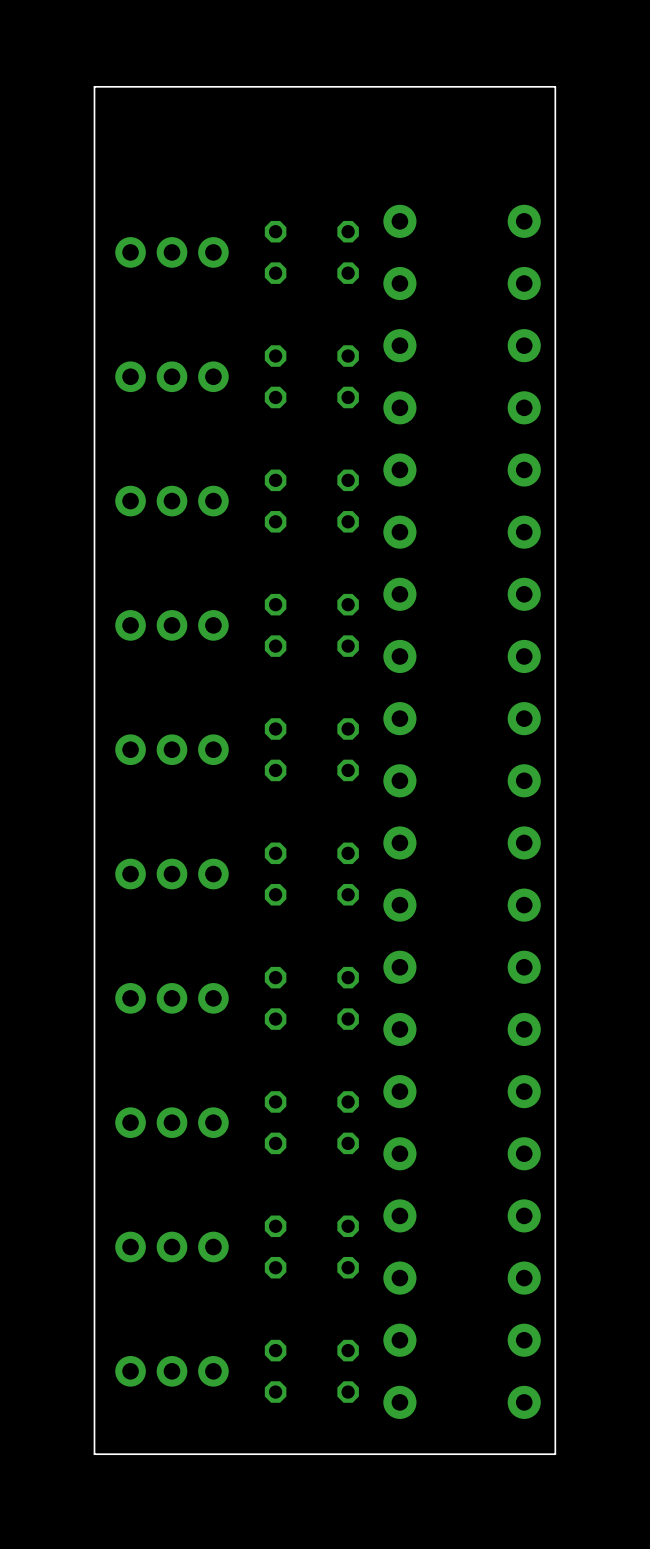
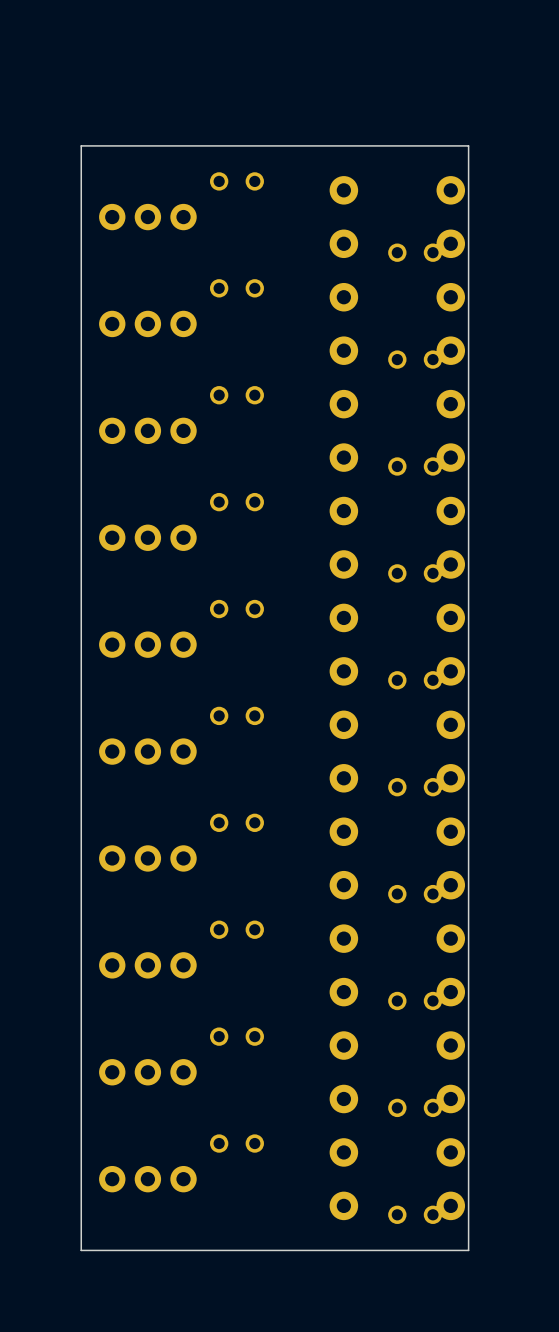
board edge: (94, 169) (94, 86) (555, 86) (555, 1454) (544, 1454) -> (81, 145) (468, 145) (468, 1250)
part: none -> (236, 181)
part: (275, 252) -> none
part: (348, 252) -> none
part: none -> (415, 252)
part: none -> (236, 288)
part: (275, 376) -> none
part: (348, 376) -> none
part: none -> (415, 359)
part: none -> (236, 395)
part: (275, 501) -> none
part: (348, 501) -> none
part: none -> (415, 466)
part: none -> (236, 502)
part: (275, 625) -> none
part: (348, 625) -> none
part: none -> (415, 573)
part: none -> (236, 609)
part: (275, 749) -> none
part: (348, 749) -> none
part: none -> (415, 680)
part: none -> (236, 715)
part: (275, 874) -> none
part: (348, 874) -> none
part: none -> (415, 787)
part: none -> (236, 822)
part: (275, 998) -> none
part: (348, 998) -> none
part: none -> (415, 894)
part: none -> (236, 929)
part: (275, 1122) -> none
part: (348, 1122) -> none
part: none -> (415, 1001)
part: none -> (236, 1036)
part: (275, 1246) -> none
part: (348, 1246) -> none
part: none -> (415, 1107)
part: none -> (236, 1143)
part: (275, 1371) -> none
part: (348, 1371) -> none
part: none -> (415, 1214)

